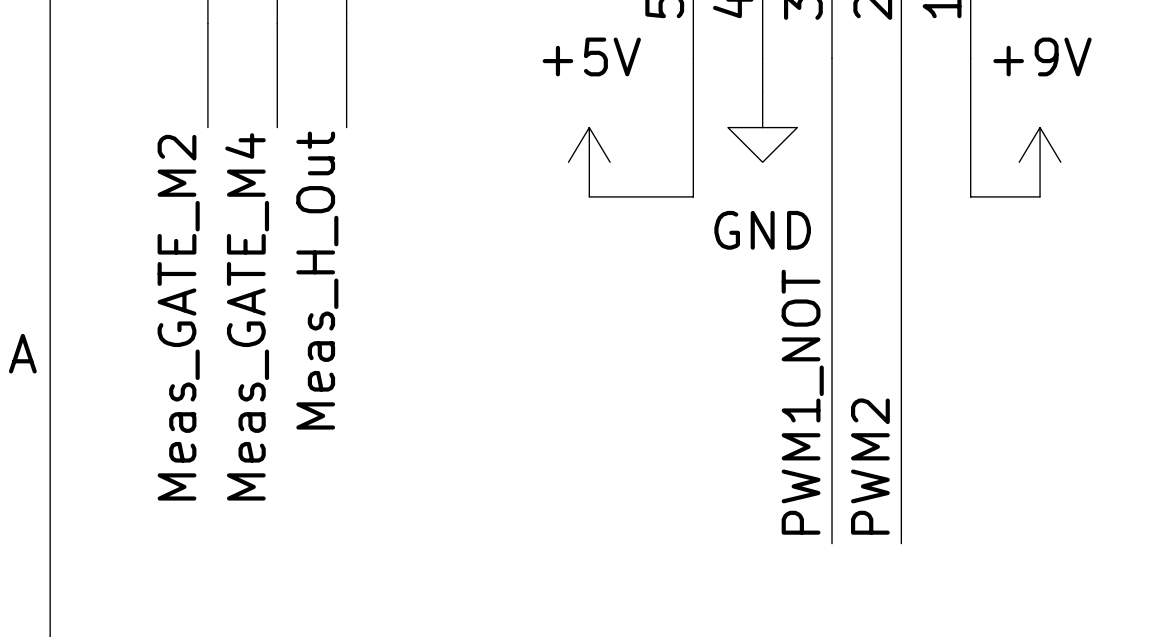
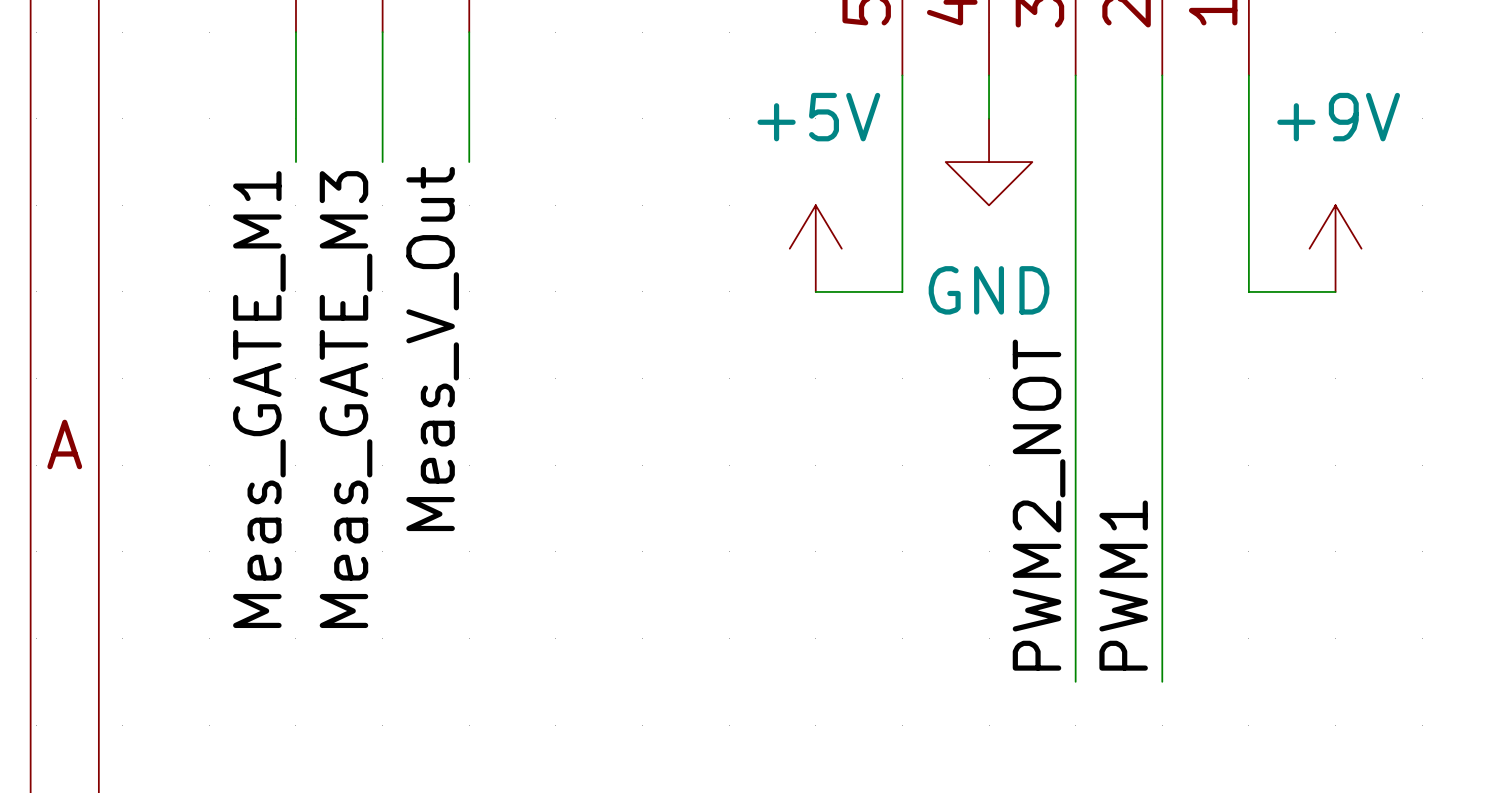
power symbol position: +5V (589, 162) -> +5V (815, 248)
power symbol position: +9V (1040, 162) -> +9V (1335, 248)
wire: (589, 196) (693, 196) -> (815, 291) (902, 291) (902, 248)
wire: (970, 196) (1040, 196) -> (1248, 248) (1248, 291) (1335, 291)
label: Meas_H_Out (317, 280) -> Meas_V_Out (432, 349)
label: Meas_GATE_M4 (247, 316) -> Meas_GATE_M3 (346, 399)
label: Meas_GATE_M2 (178, 317) -> Meas_GATE_M1 (259, 399)
label: PWM1_NOT (802, 402) -> PWM2_NOT (1039, 505)
label: PWM2 (870, 466) -> PWM1 (1123, 585)

